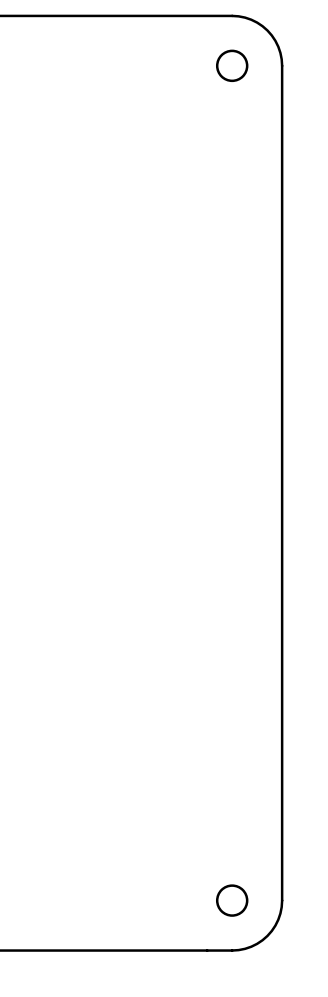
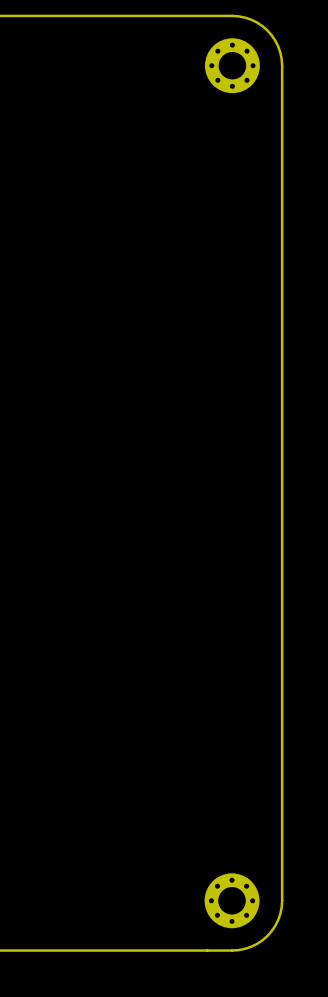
round board edge: [215, 49, 249, 83] -> none
part: none -> (232, 65)
round board edge: [215, 884, 249, 917] -> none
part: none -> (232, 900)

